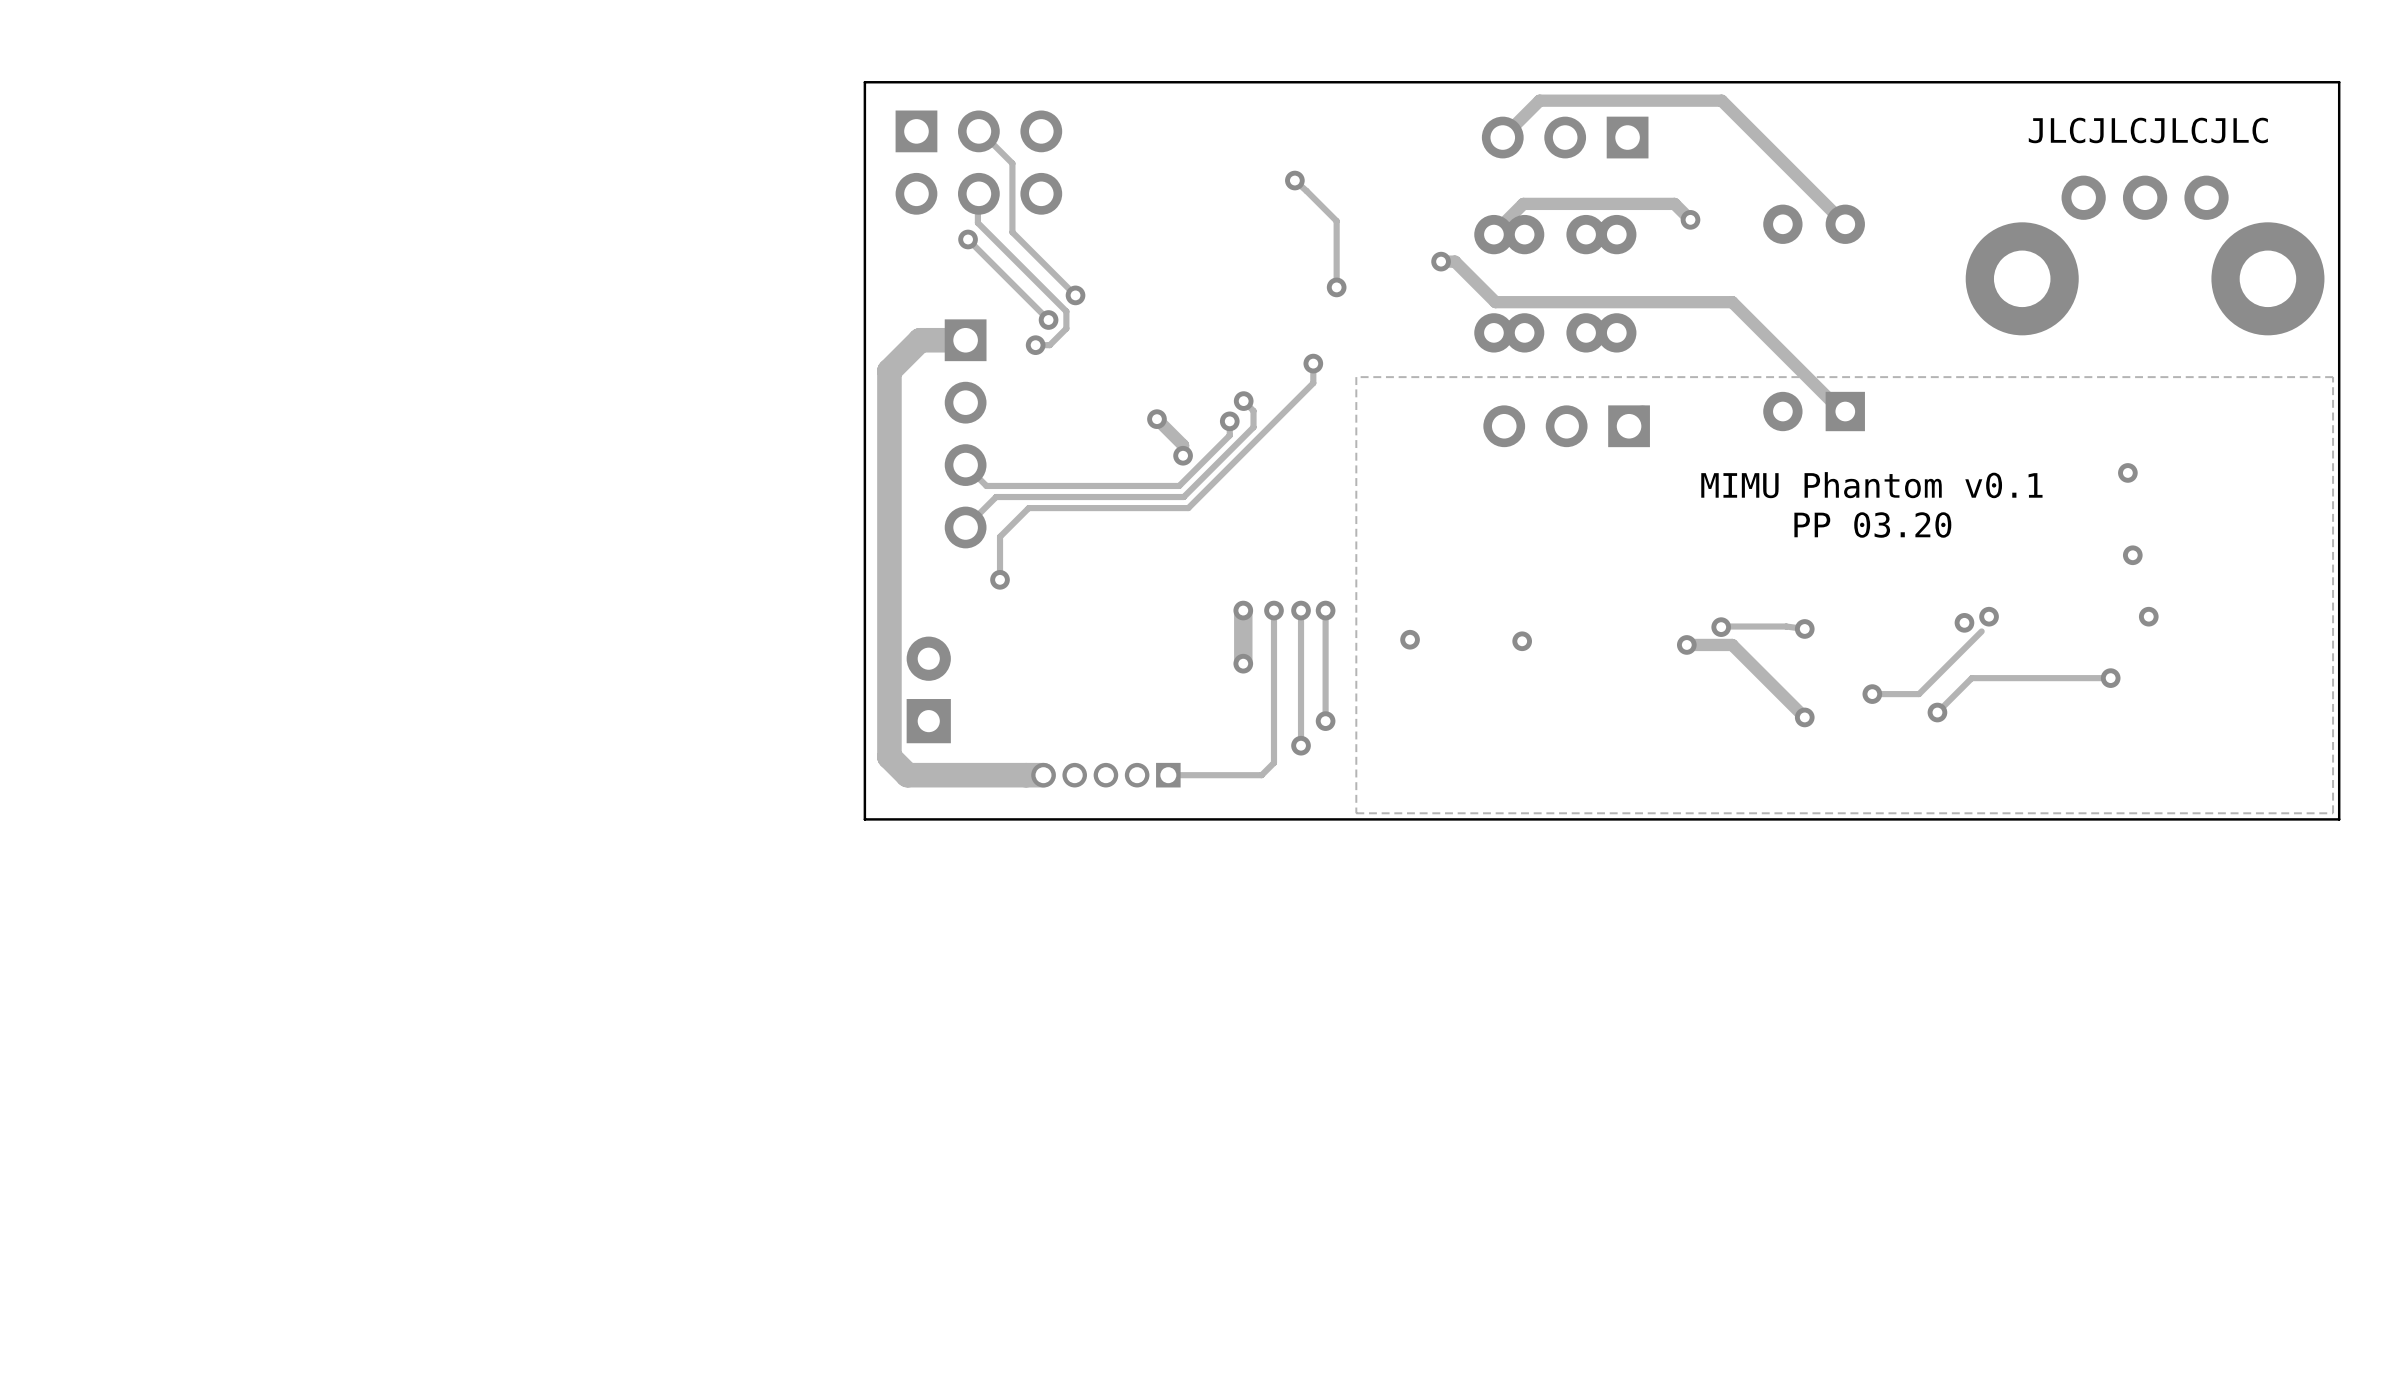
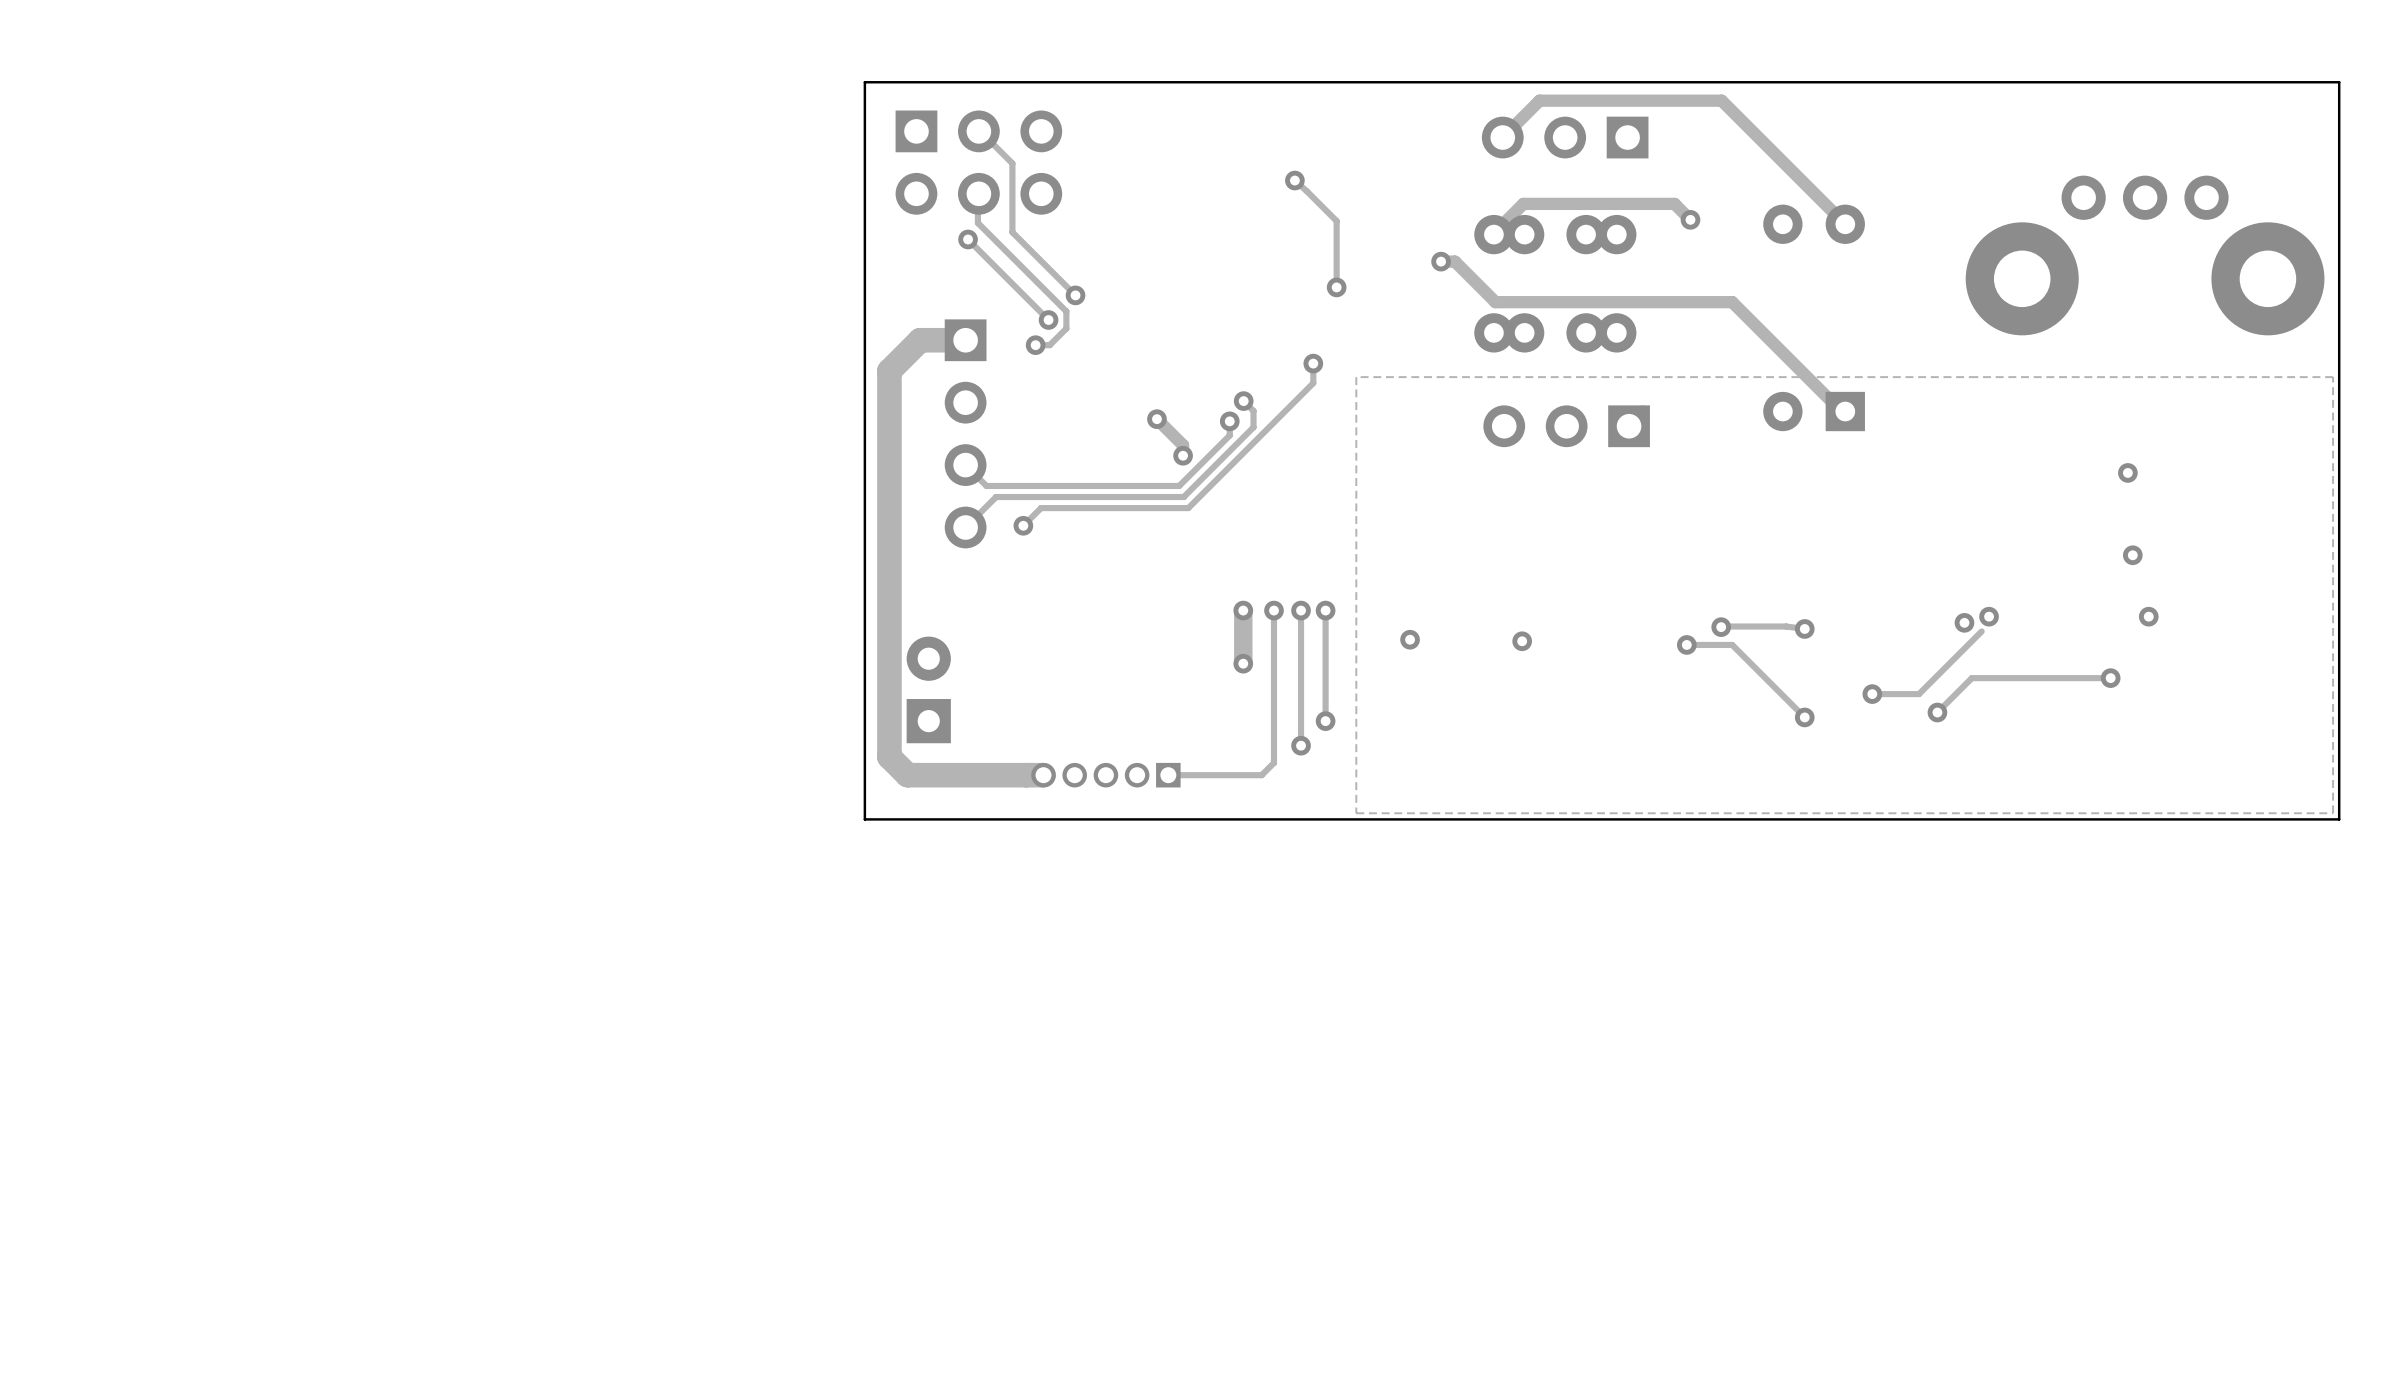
text: JLCJLCJLCJLC (2148, 130) -> none
text: MIMU Phantom v0.1 (1871, 485) -> none
track: (1041, 508) (1028, 508) (1000, 536) (1000, 579) -> (1041, 508) (1023, 525)
text: PP 03.20 (1872, 525) -> none
via position: (1000, 579) -> (1023, 525)
track width: thick (1686, 644) (1732, 644) (1804, 717) -> thin (1686, 644) (1732, 644) (1804, 717)

